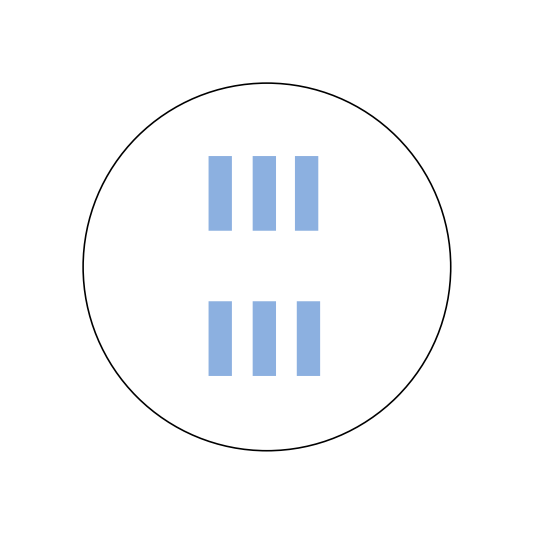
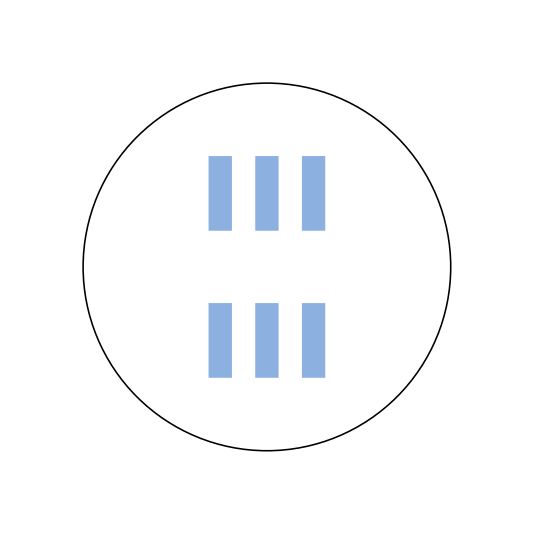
part footprint: [82, 82, 452, 452] -> [83, 83, 451, 451]

